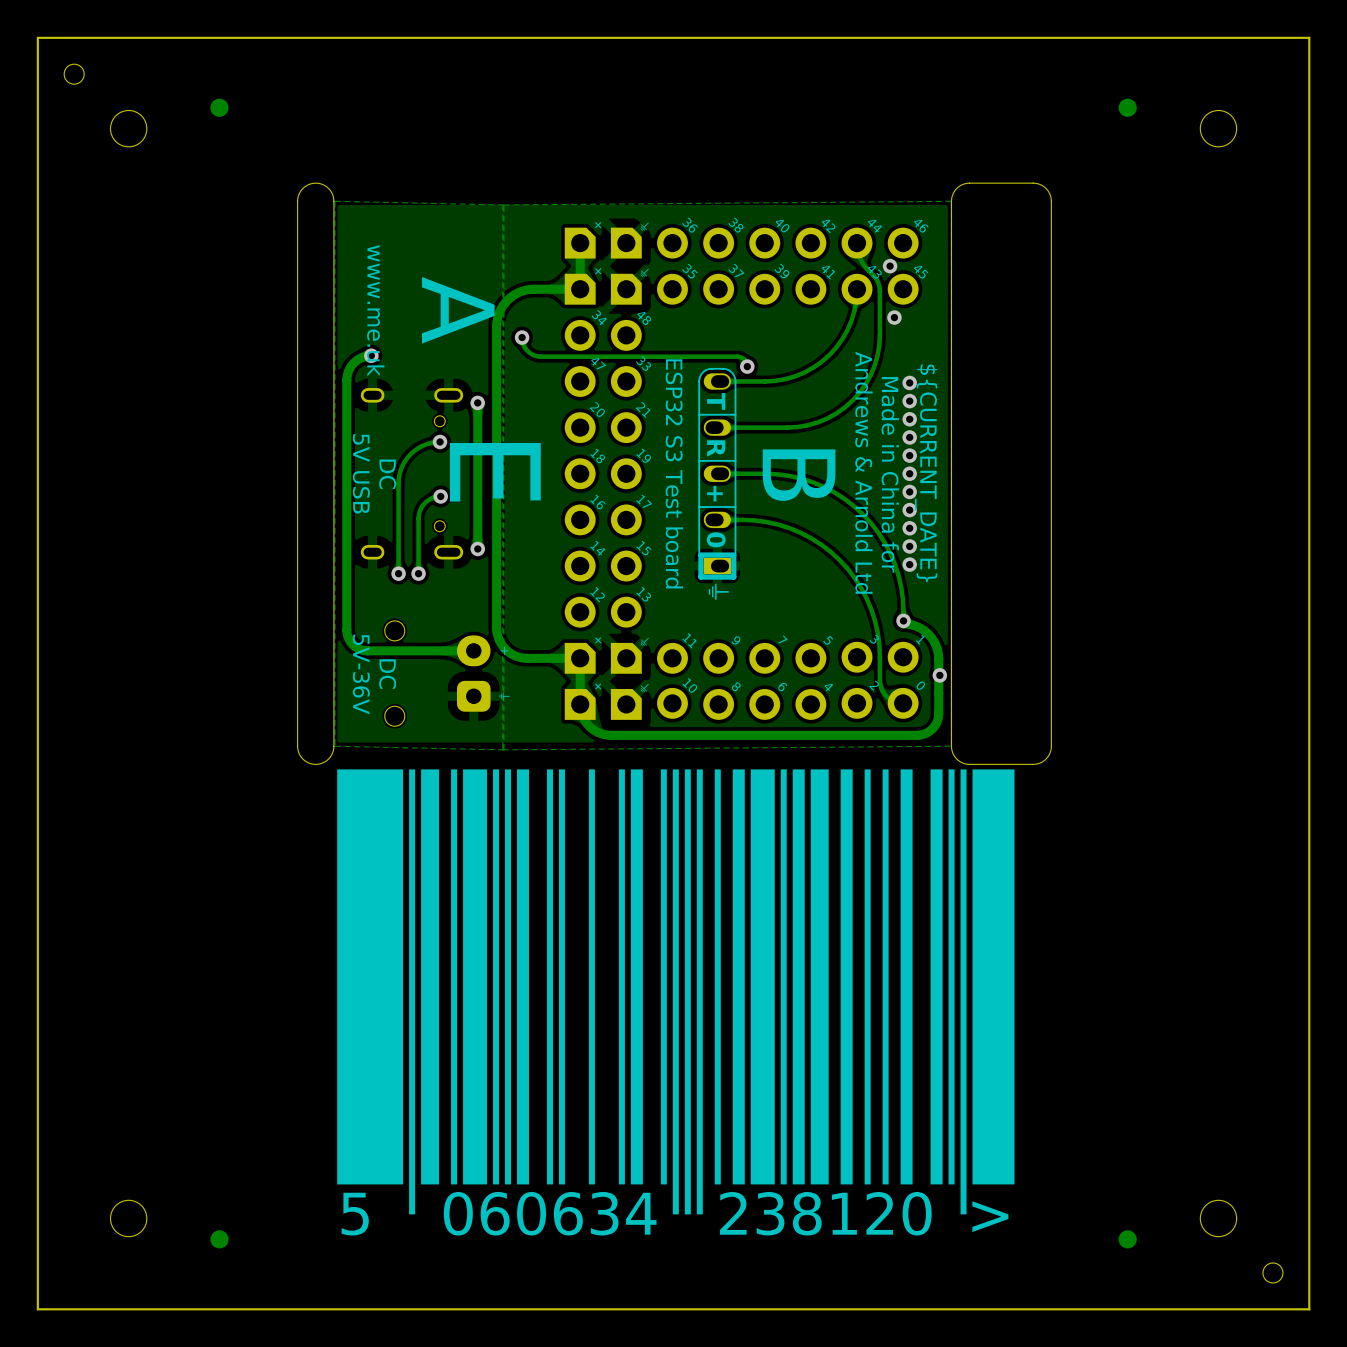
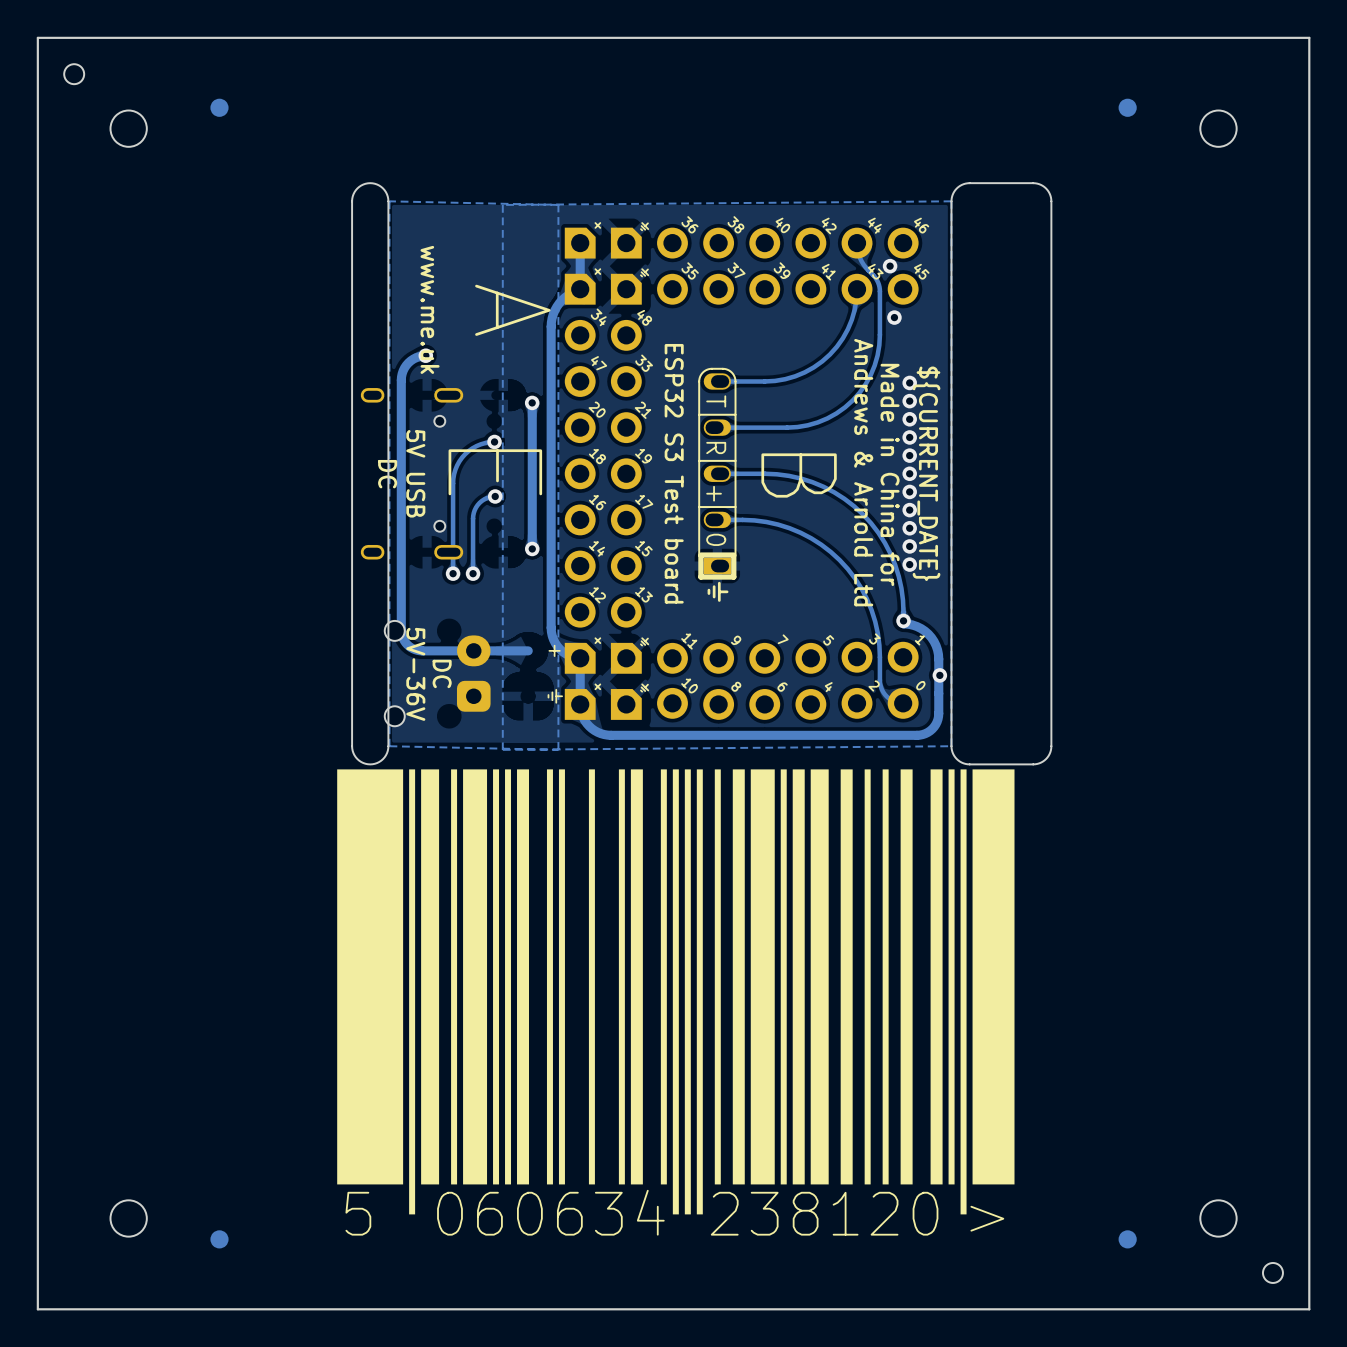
board edge: (333, 201) (333, 746) (328, 759) (315, 764) (302, 759) (297, 746) (297, 201) (302, 188) (315, 183) (328, 188) (333, 201) -> (388, 201) (388, 746) (383, 759) (370, 764) (357, 759) (352, 746) (352, 201) (357, 188) (370, 183) (383, 188) (388, 201)
zone outline: (335, 201) (335, 746) (503, 749) (503, 204) (335, 201) -> (389, 201) (389, 746) (558, 749) (558, 204) (389, 201)
track: (580, 289) (529, 289) (517, 292) (502, 306) (496, 326) (497, 635) (505, 649) (519, 657) (580, 658) -> none
track: none -> (588, 289) (572, 292) (562, 300) (554, 310) (551, 326) (551, 631) (555, 643) (563, 652) (573, 657) (581, 658)
text position: www.me.uk (375, 310) -> www.me.uk (430, 309)
text position: A (458, 310) -> A (512, 310)
track: (522, 337) (527, 351) (539, 356) (737, 356) (744, 359) (747, 366) -> none
via: (522, 337) -> none
track: (371, 355) (356, 360) (350, 367) (347, 377) (347, 634) (352, 644) (363, 650) (422, 650) -> (425, 355) (416, 357) (408, 362) (403, 370) (401, 380) (401, 632) (403, 639) (409, 646) (422, 650)
via: (371, 355) -> none
via: none -> (425, 355)
via: (747, 366) -> none
via: (477, 402) -> none
via: none -> (532, 402)
track: (477, 403) (477, 548) -> (532, 403) (532, 548)
track: (440, 441) (430, 443) (417, 448) (407, 457) (400, 469) (398, 483) (398, 573) -> (494, 441) (480, 444) (468, 451) (459, 461) (455, 469) (453, 483) (453, 573)
via: (440, 441) -> none
via: none -> (494, 441)
text position: 5V USB (361, 473) -> 5V USB (415, 473)
track: (440, 496) (427, 501) (419, 512) (418, 573) -> (495, 496) (481, 501) (473, 512) (473, 573)
via: (440, 496) -> none
via: none -> (495, 496)
via: (477, 548) -> none
via: none -> (532, 548)
via: (398, 573) -> none
via: (418, 573) -> none
via: none -> (453, 573)
via: none -> (473, 573)
text position: + (504, 650) -> + (554, 650)
track: none -> (528, 650) (473, 650)
text position: 5V-36V (361, 674) -> 5V-36V (415, 674)
text position: DC (387, 674) -> DC (442, 673)
text position: ⏚ (504, 696) -> ⏚ (555, 696)

